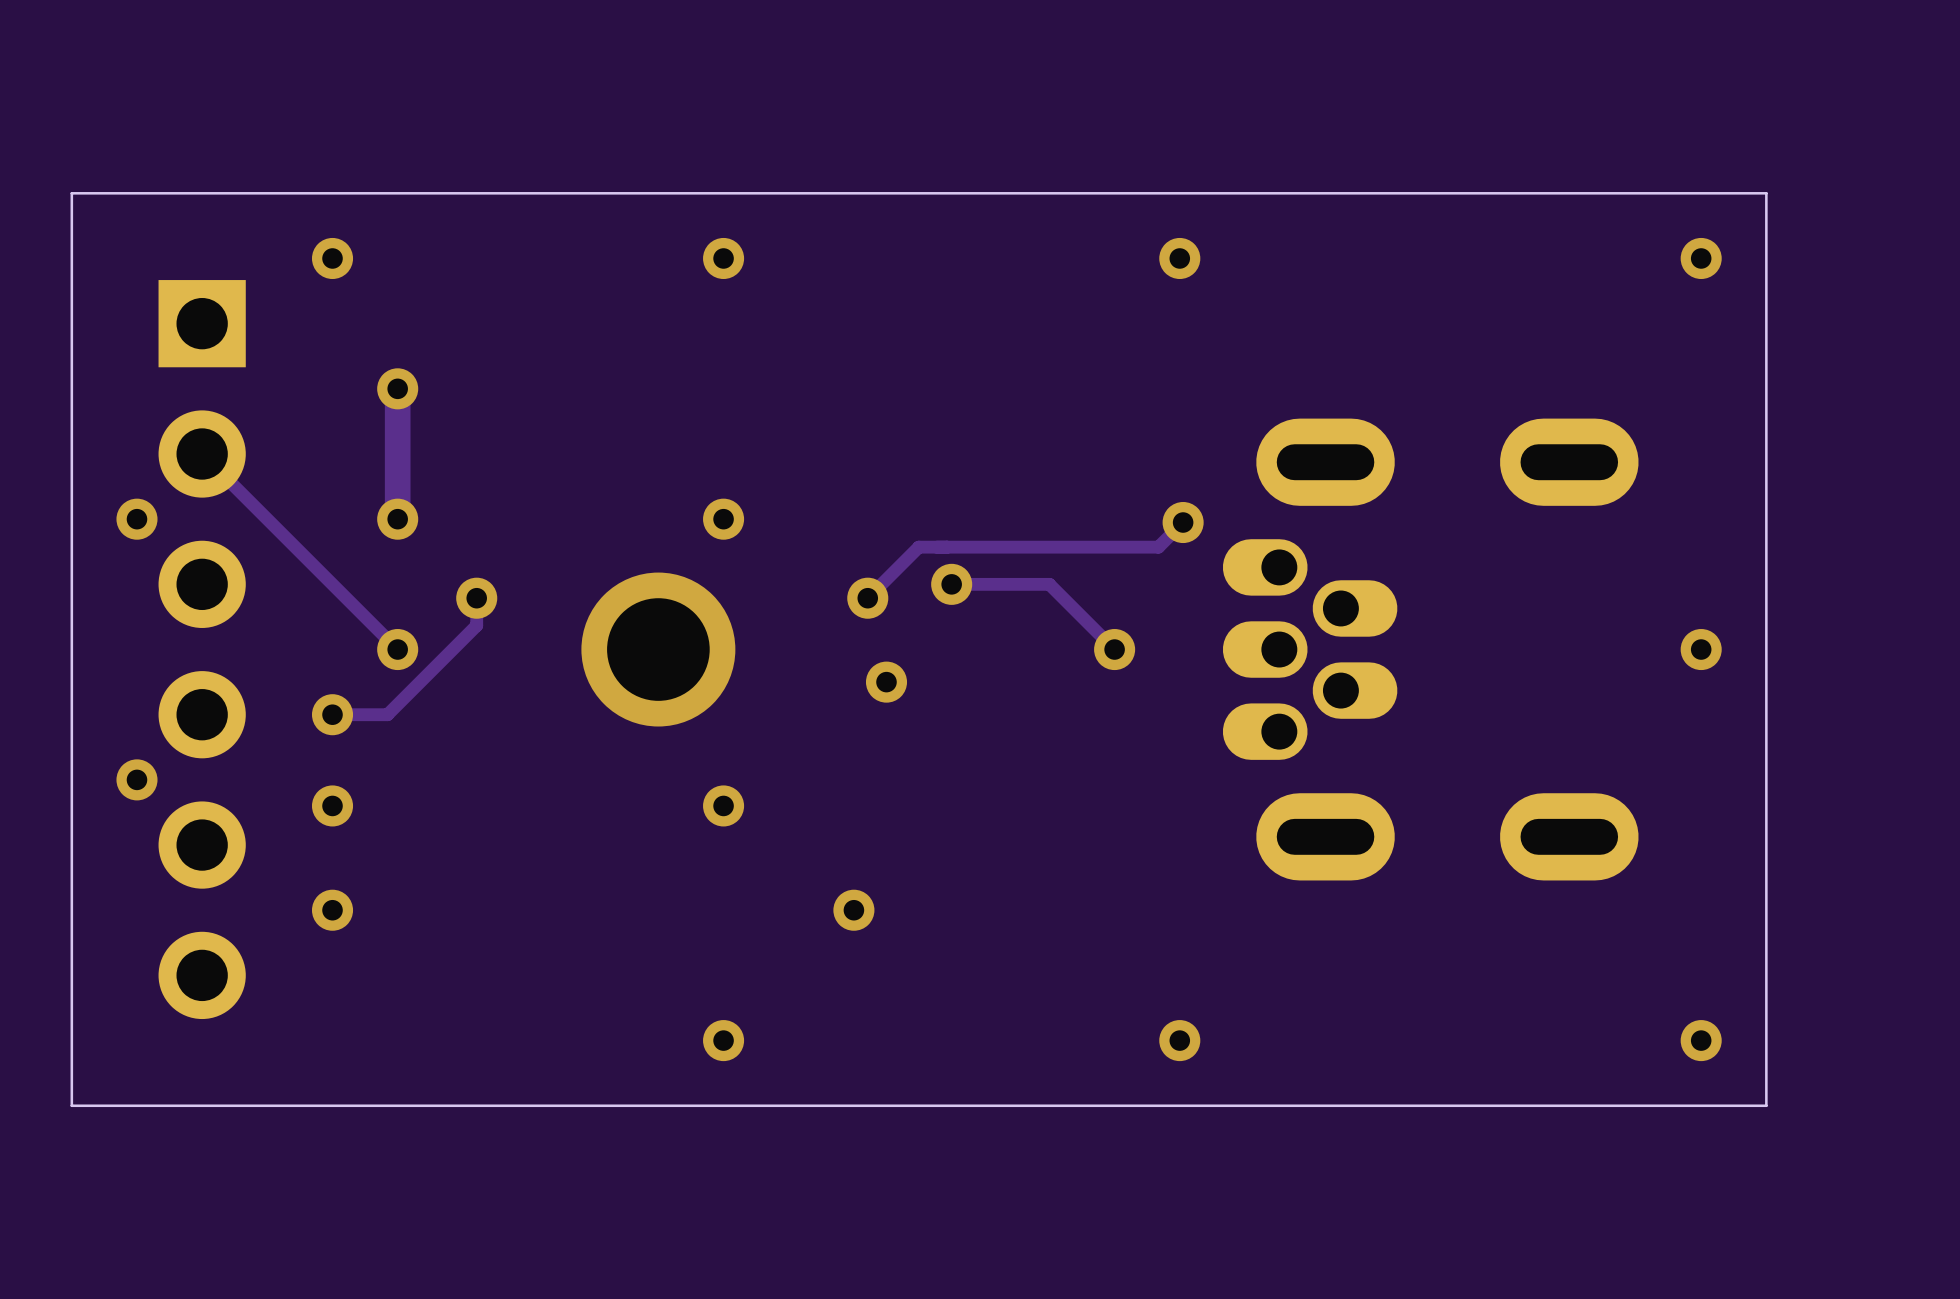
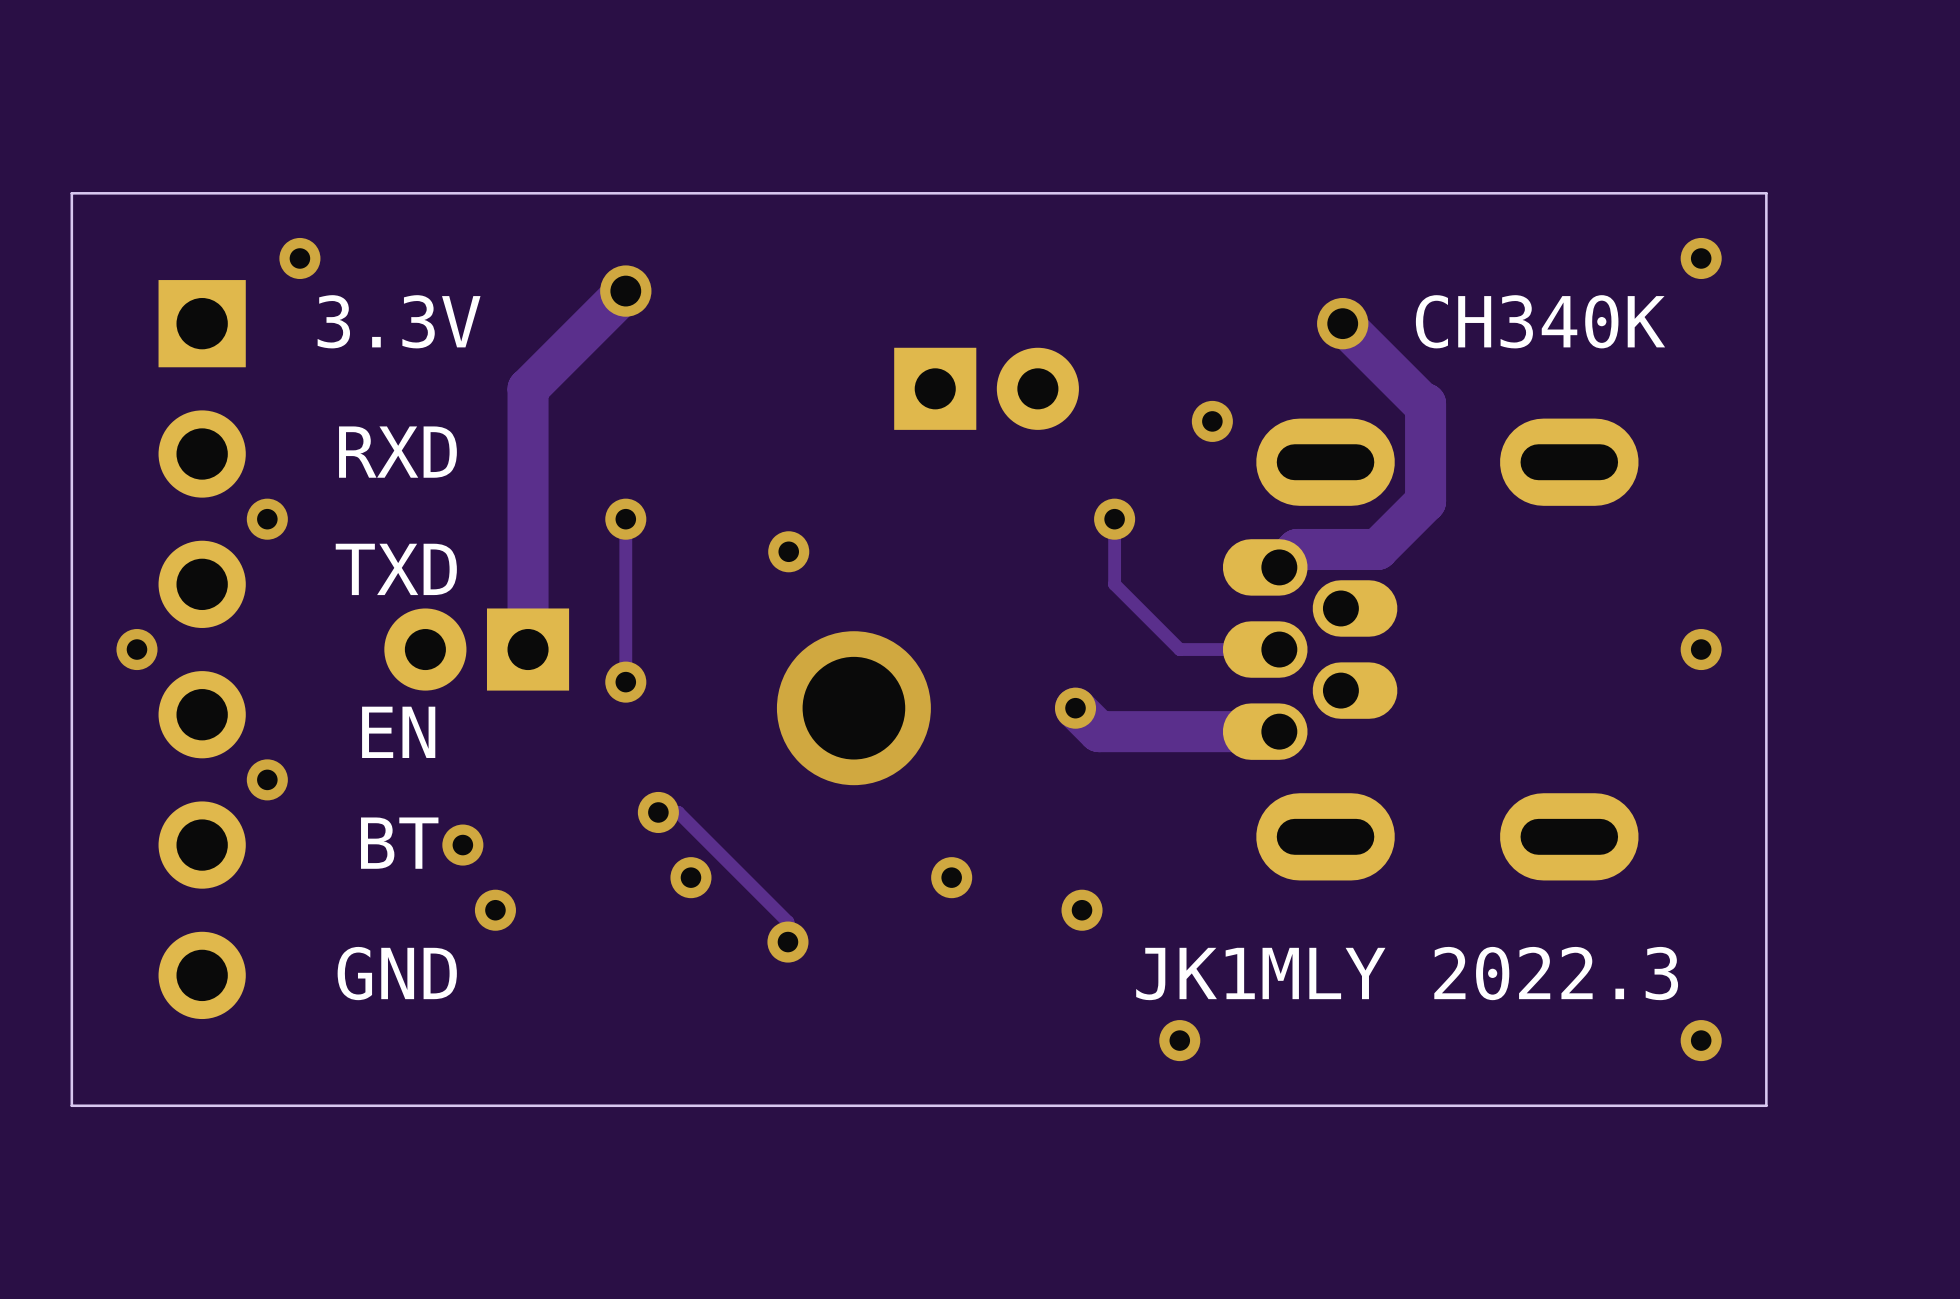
via position: (332, 258) -> (299, 258)
via: (723, 258) -> none
via: (1179, 258) -> none
track: none -> (625, 291) (528, 388) (528, 649)
via: none -> (625, 291)
text: none -> 3.3V (399, 321)
text: none -> CH340K (1540, 321)
track: none -> (1342, 323) (1422, 403) (1425, 403) (1425, 501) (1377, 549) (1297, 549) (1279, 567)
via: none -> (1342, 323)
track: (397, 388) (397, 519) -> none
via: (397, 388) -> none
part: none -> (986, 388)
via: none -> (1212, 421)
text: none -> RXD (397, 452)
track: (202, 454) (397, 649) -> none
via: (136, 519) -> none
via: none -> (267, 519)
via: (397, 519) -> none
track: none -> (625, 519) (625, 682)
via: none -> (625, 519)
via: (723, 519) -> none
track: none -> (1114, 519) (1114, 584) (1179, 649) (1279, 649)
via: none -> (1114, 519)
track: (1183, 522) (1158, 547) (918, 547) (867, 598) -> none
via: (1183, 522) -> none
via: none -> (788, 551)
text: none -> TXD (396, 569)
track: (951, 584) (1049, 584) (1114, 649) -> none
via: (951, 584) -> none
track: (476, 598) (476, 625) (387, 714) (332, 714) -> none
via: (476, 598) -> none
via: (867, 598) -> none
via: none -> (136, 649)
via: (397, 649) -> none
part: none -> (476, 649)
via position: (658, 649) -> (853, 708)
via: (1114, 649) -> none
via: none -> (625, 682)
via: (886, 682) -> none
track: none -> (1075, 708) (1098, 731) (1279, 731)
via: none -> (1075, 708)
via: (332, 714) -> none
text: none -> EN (398, 732)
via: (136, 779) -> none
via: none -> (267, 779)
via: (332, 805) -> none
via: (723, 805) -> none
track: none -> (658, 812) (678, 812) (787, 922) (787, 942)
via: none -> (658, 812)
text: none -> BT (399, 843)
via: none -> (462, 845)
via: none -> (690, 877)
via: none -> (951, 877)
via: (332, 910) -> none
via: none -> (495, 910)
via: (853, 910) -> none
via: none -> (1082, 910)
via: none -> (787, 942)
text: none -> GND (397, 973)
text: none -> JK1MLY 2022.3 (1407, 973)
via: (723, 1040) -> none

